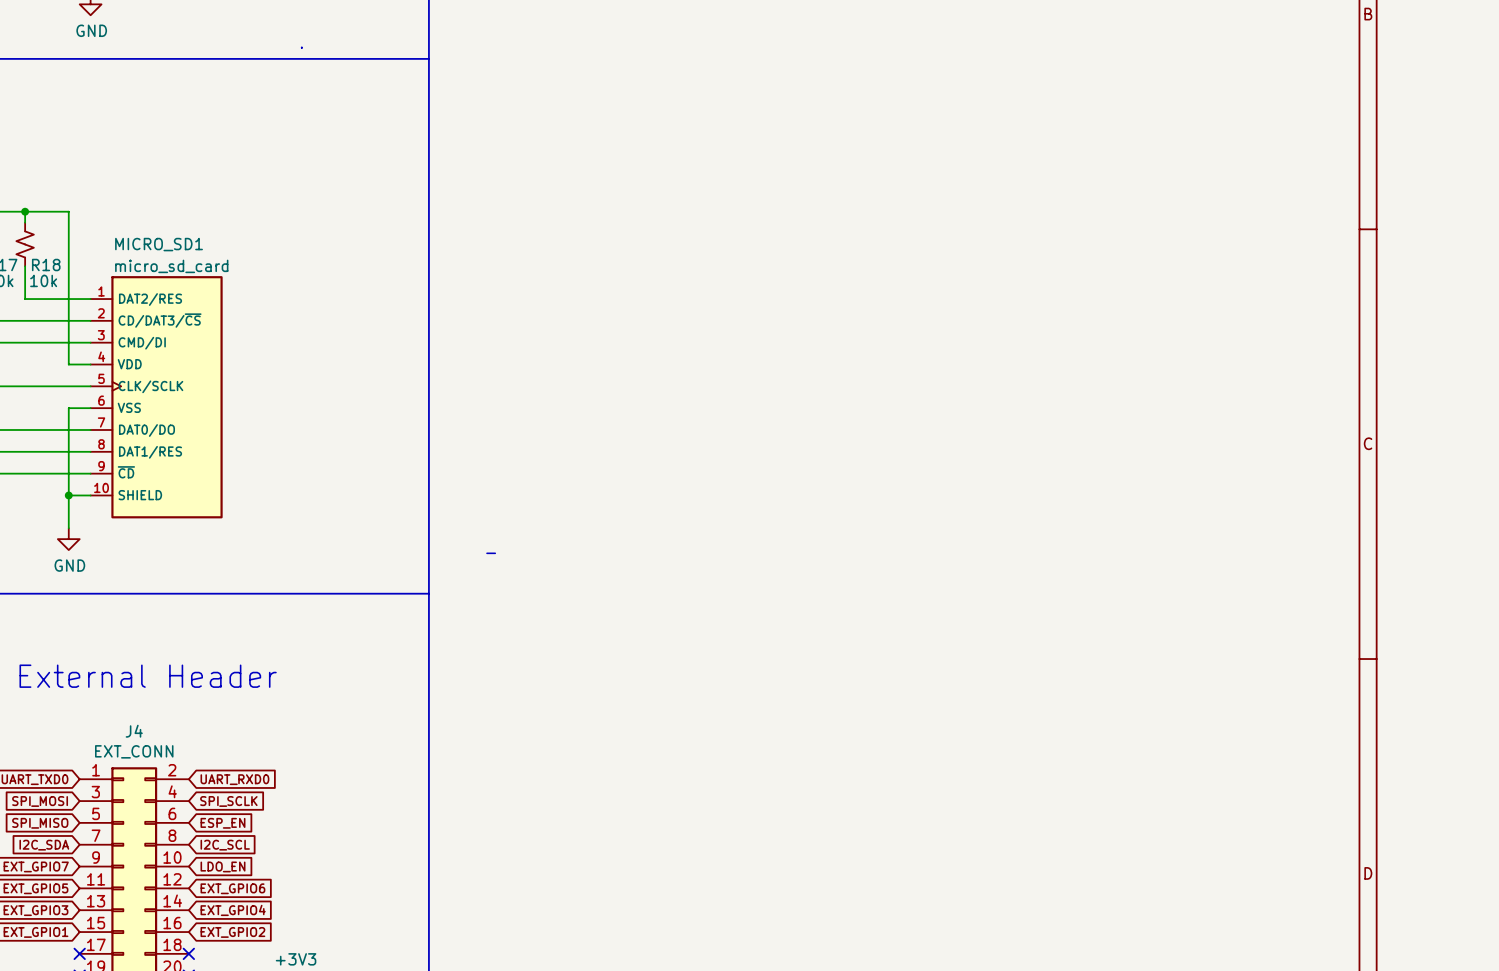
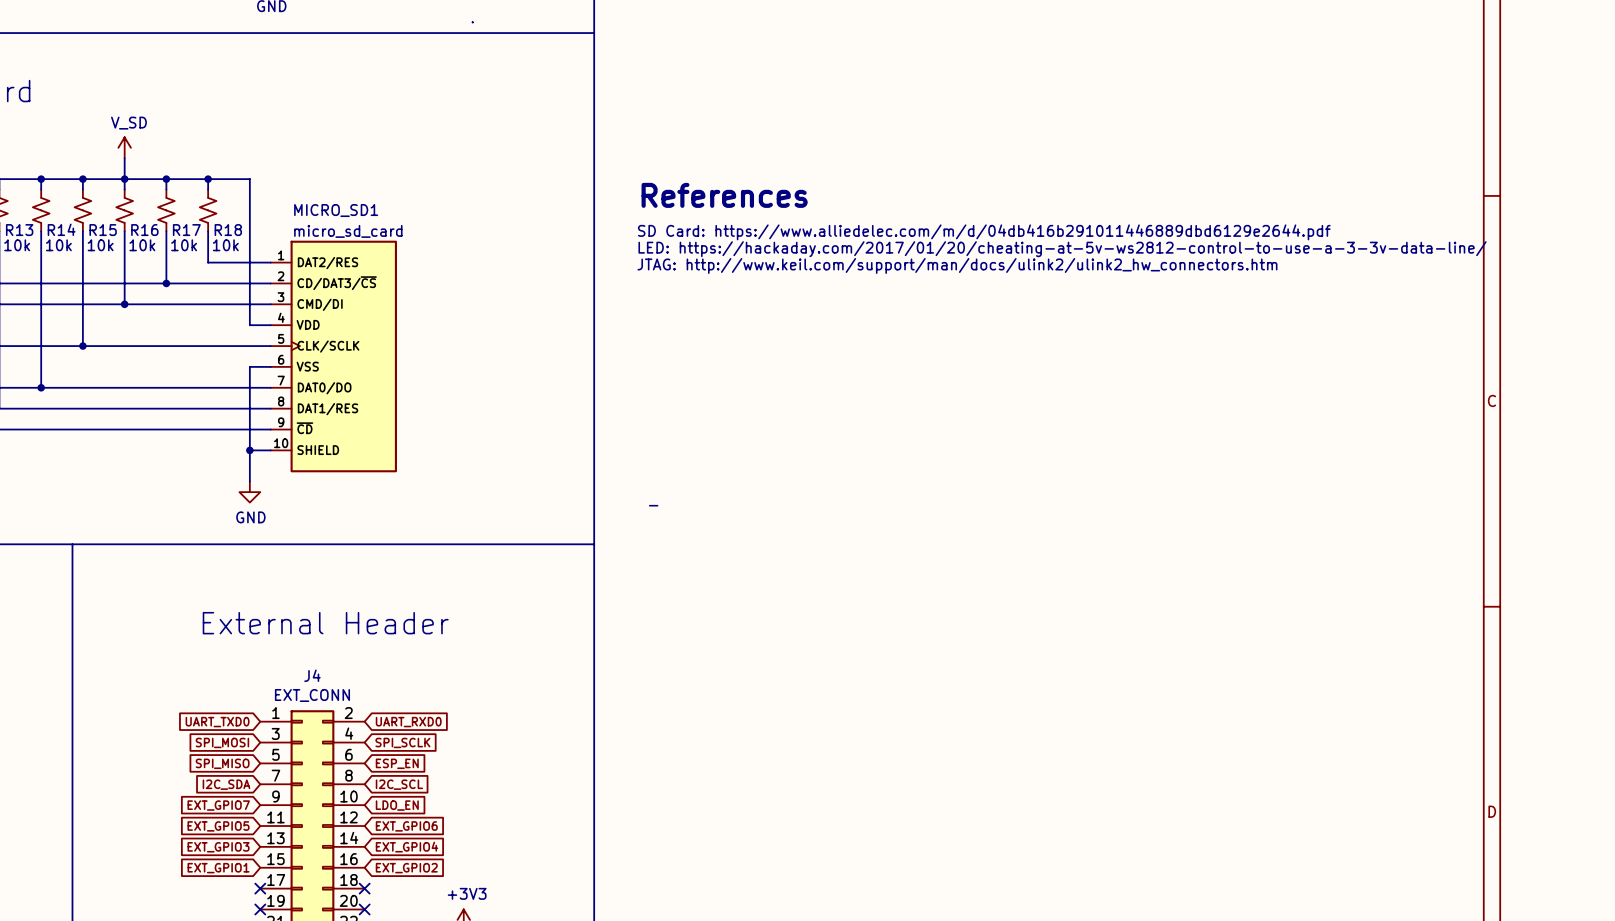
text: none -> References (724, 195)
text: none -> SD Card: https://www.alliedelec.com/m/d/04db416b291011446889dbd6129e2644.pdf (984, 232)
text: none -> LED: https://hackaday.com/2017/01/20/cheating-at-5v-ws2812-control-to-use-a-3-3v-data-line/ (1062, 249)
text: none -> JTAG: http://www.keil.com/support/man/docs/ulink2/ulink2_hw_connectors.htm (957, 265)

